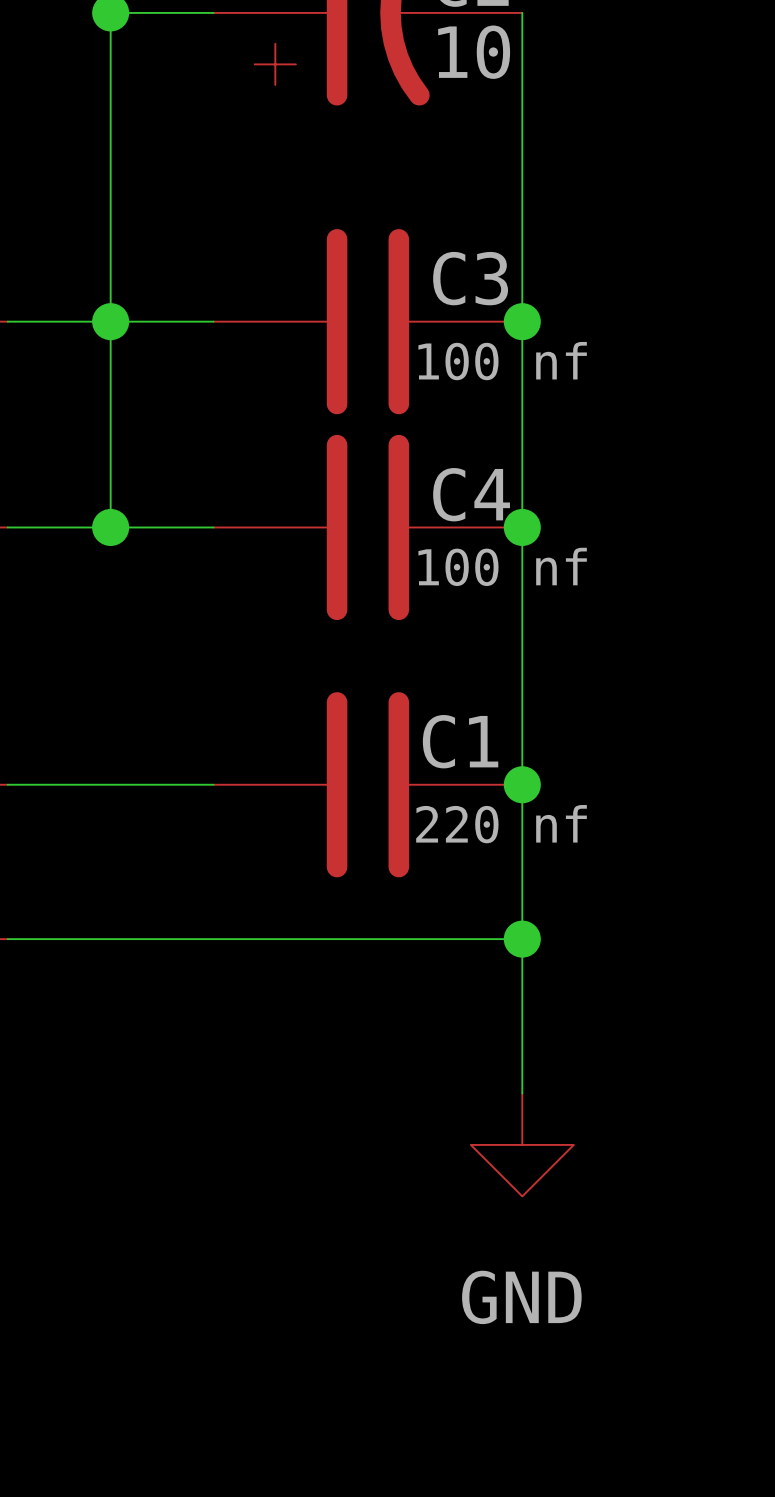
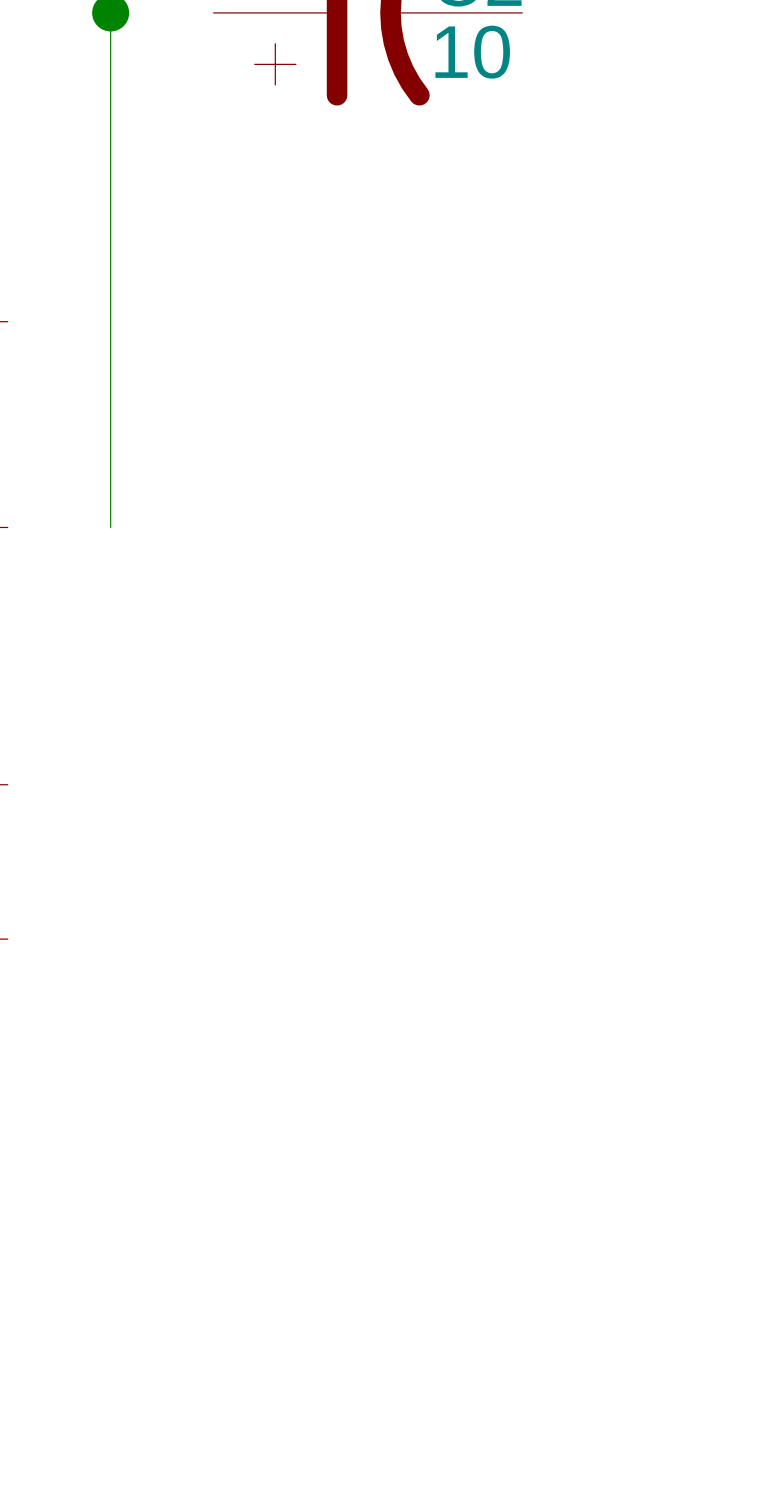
wire: (110, 12) (213, 12) -> none
wire: (522, 12) (522, 1093) -> none
wire: (7, 321) (213, 321) -> none
junction: (110, 321) -> none
C3: 100 nf (367, 321) -> none
junction: (522, 321) -> none
wire: (7, 527) (213, 527) -> none
junction: (110, 527) -> none
C4: 100 nf (367, 527) -> none
junction: (522, 527) -> none
wire: (7, 784) (213, 784) -> none
C1: 220 nf (367, 784) -> none
junction: (522, 784) -> none
wire: (7, 939) (522, 939) -> none
junction: (522, 939) -> none
power symbol: GND (522, 1144) -> none

